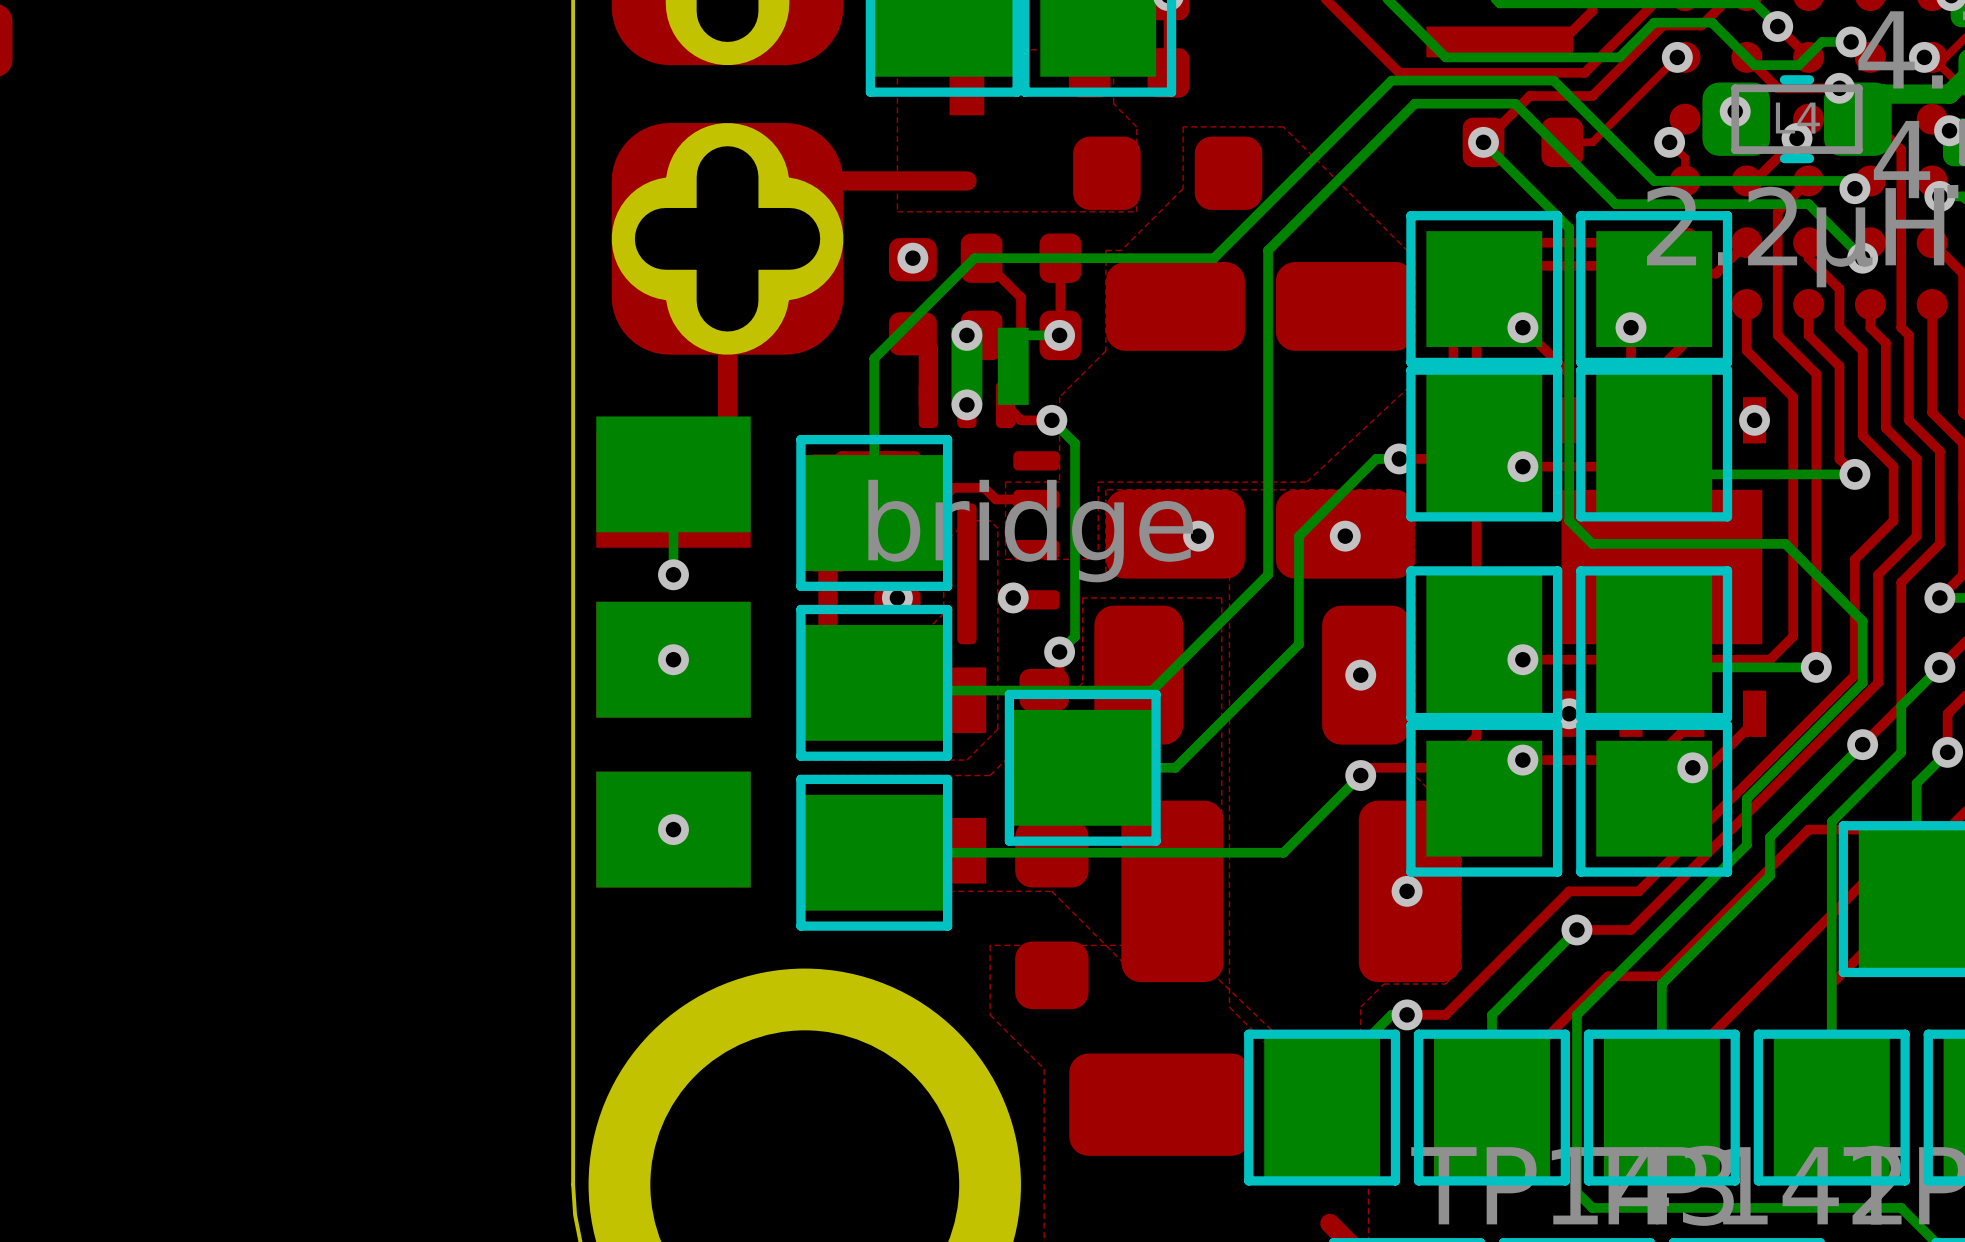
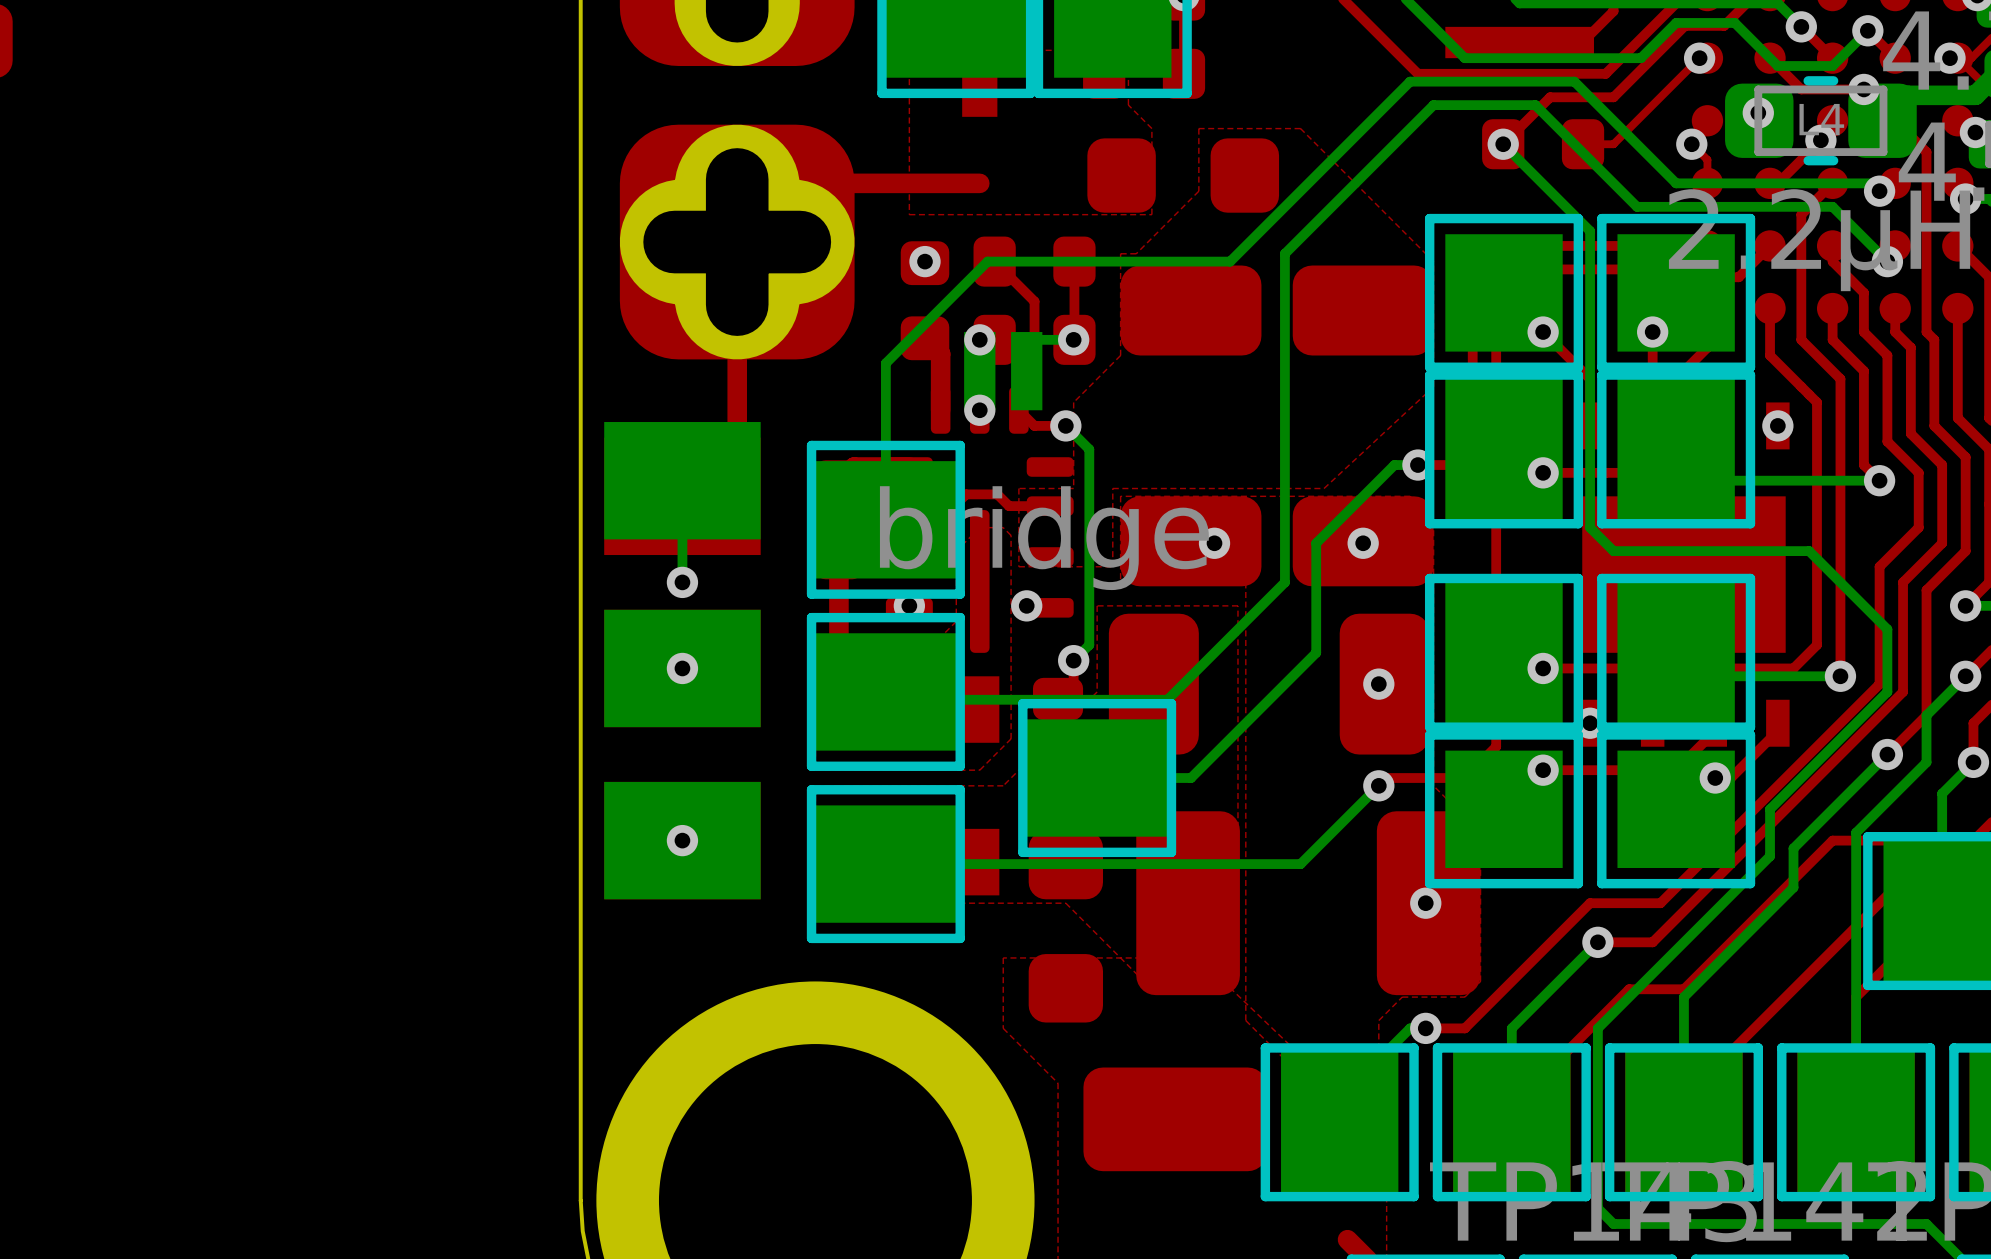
bottom track: (1851, 41) (1822, 41) (1798, 65) -> (1867, 30) (1832, 65) (1822, 65)
via position: (1851, 41) -> (1867, 30)

